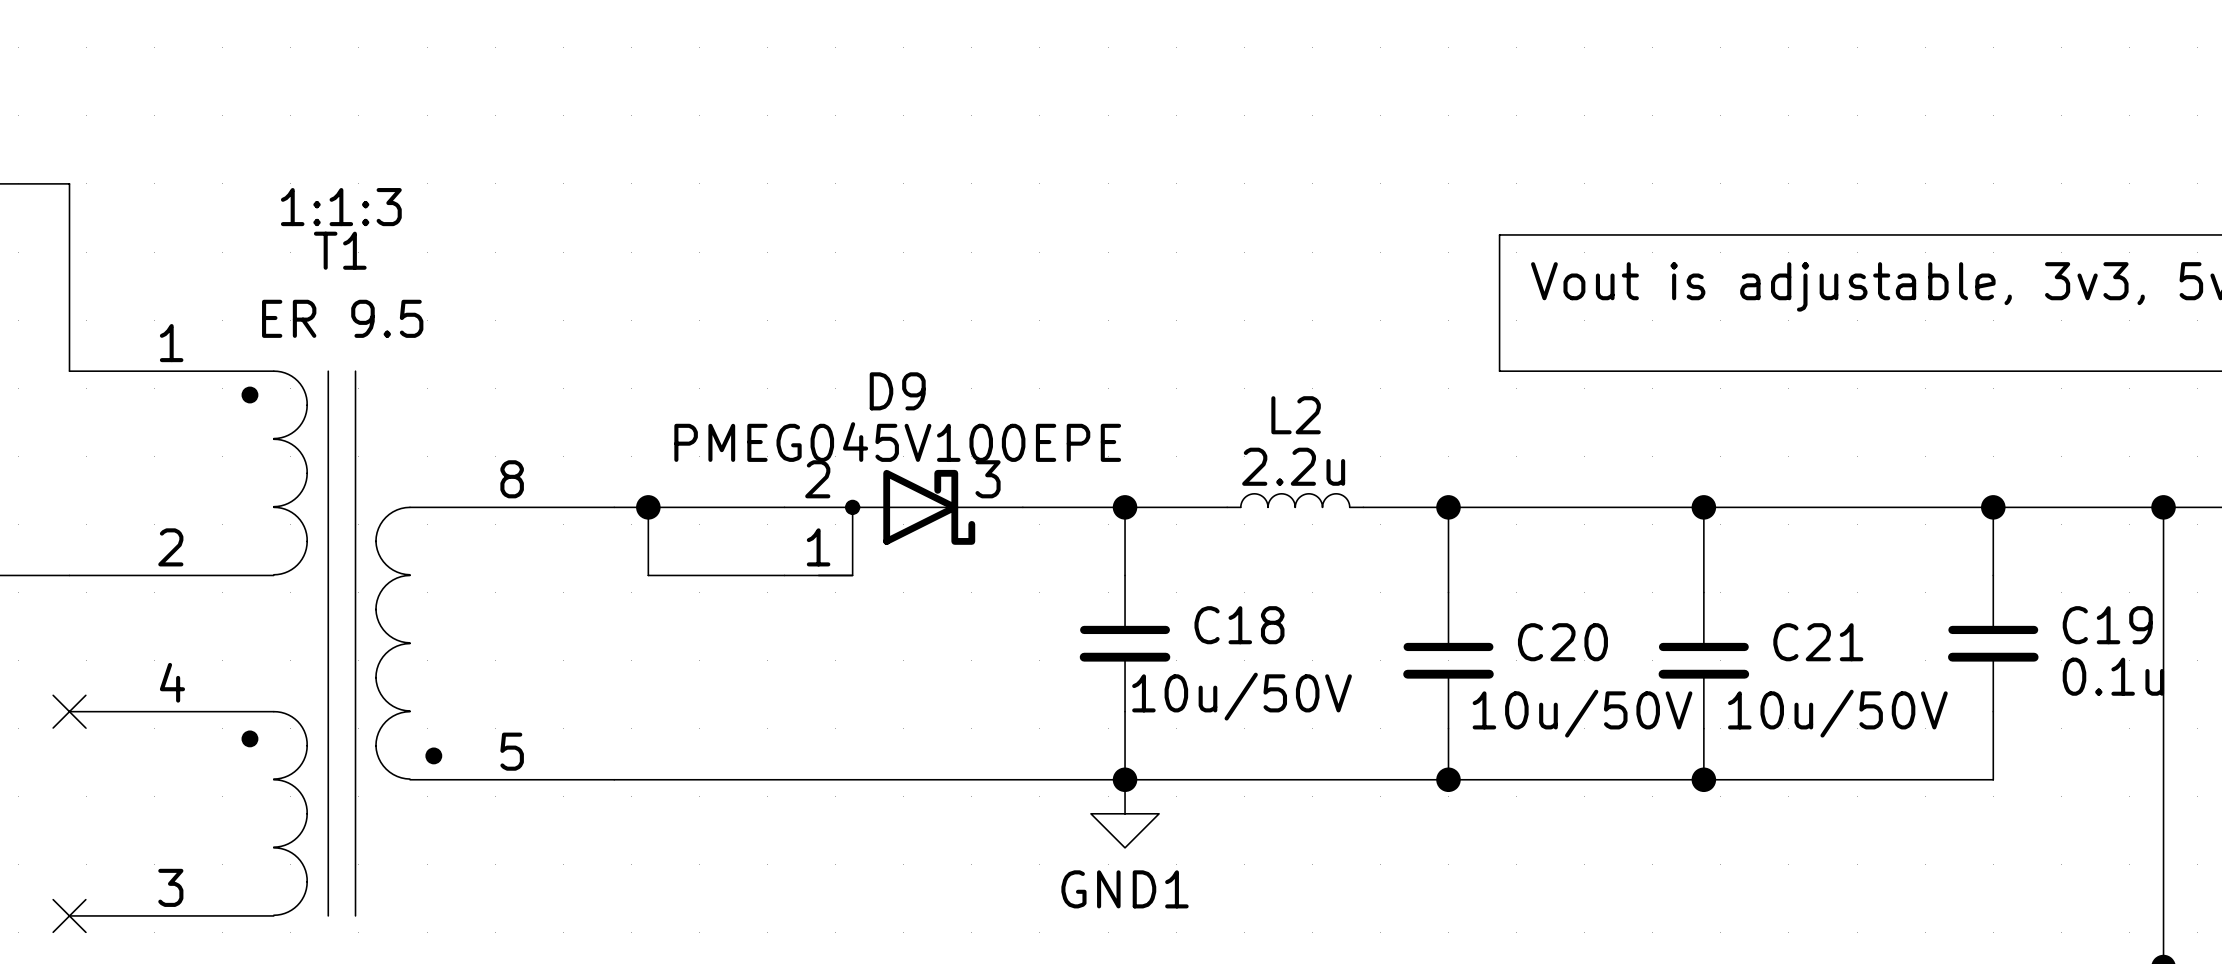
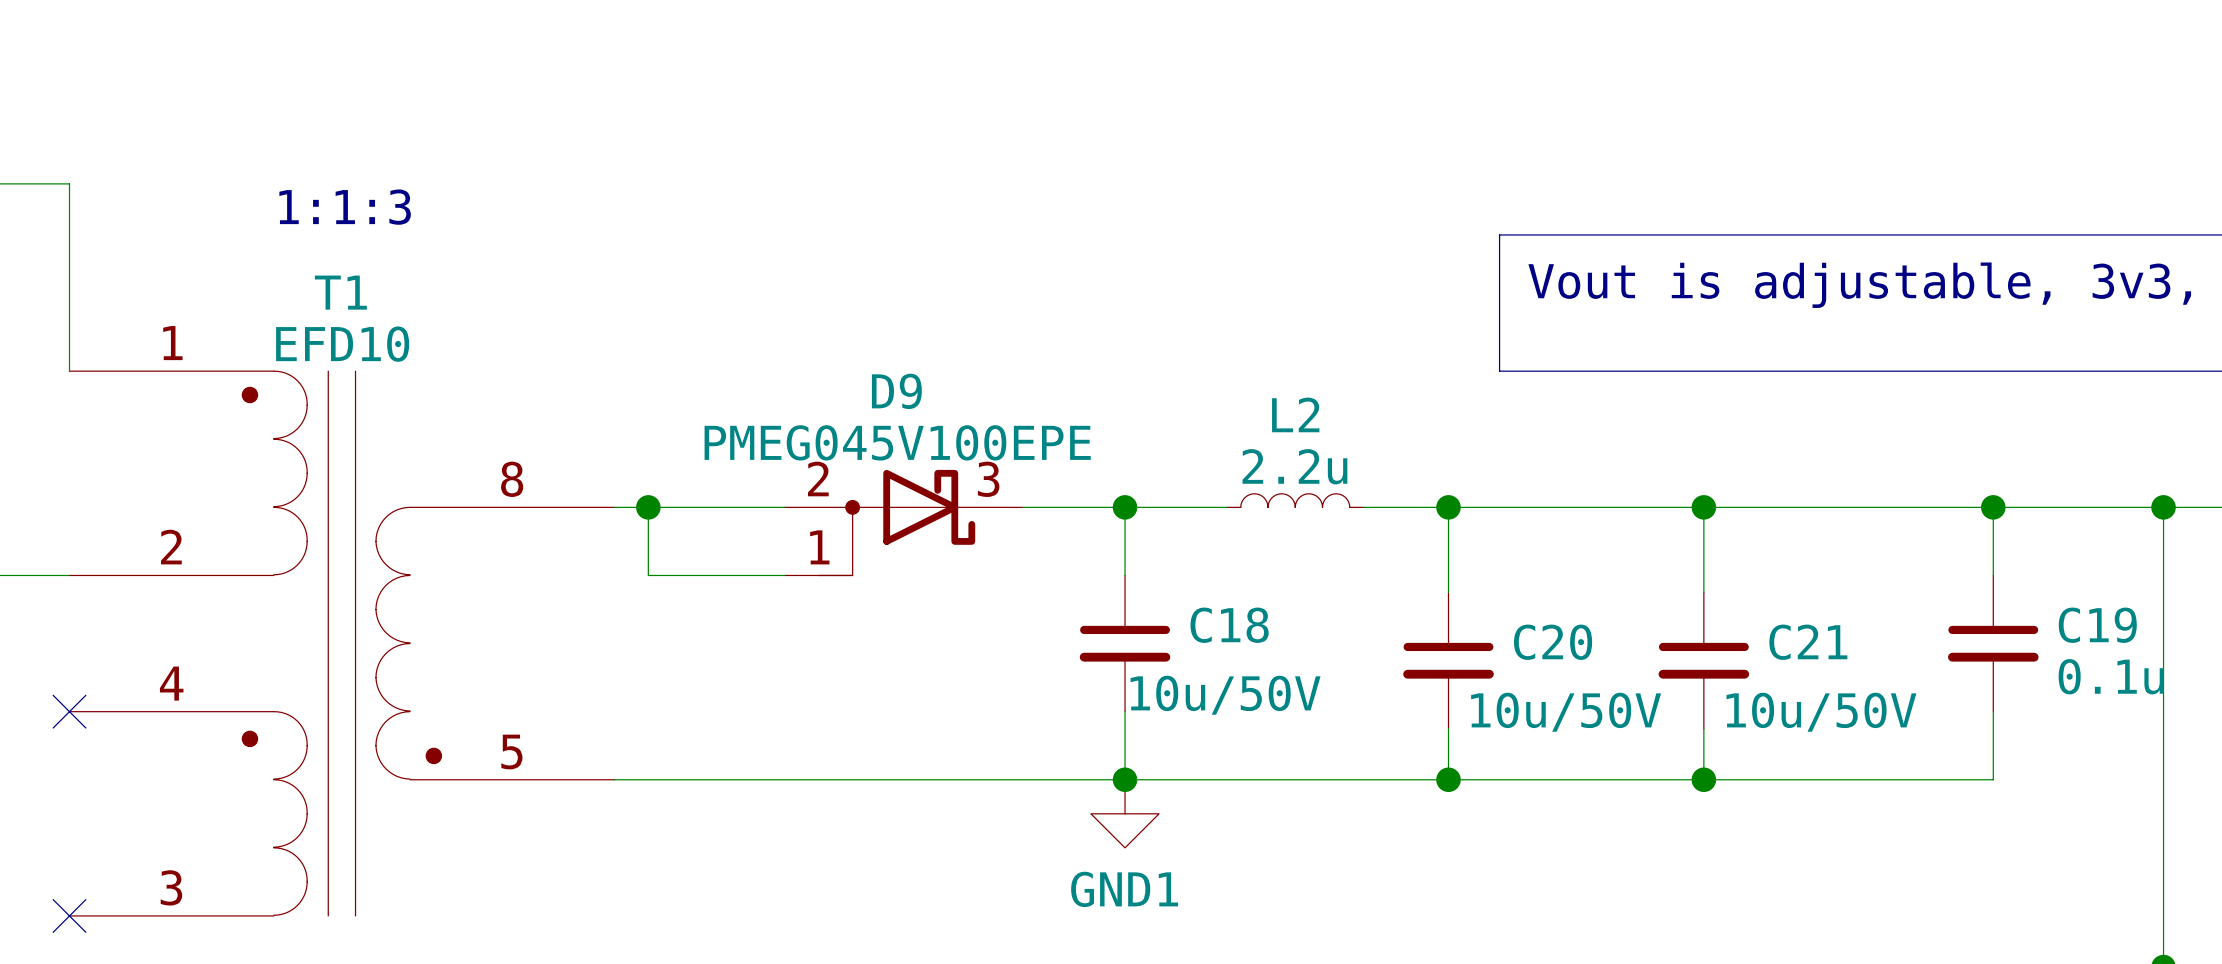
T1 name position: T1 (340, 250) -> T1 (340, 292)
T1 value: ER 9.5 (342, 318) -> EFD10 (342, 344)

